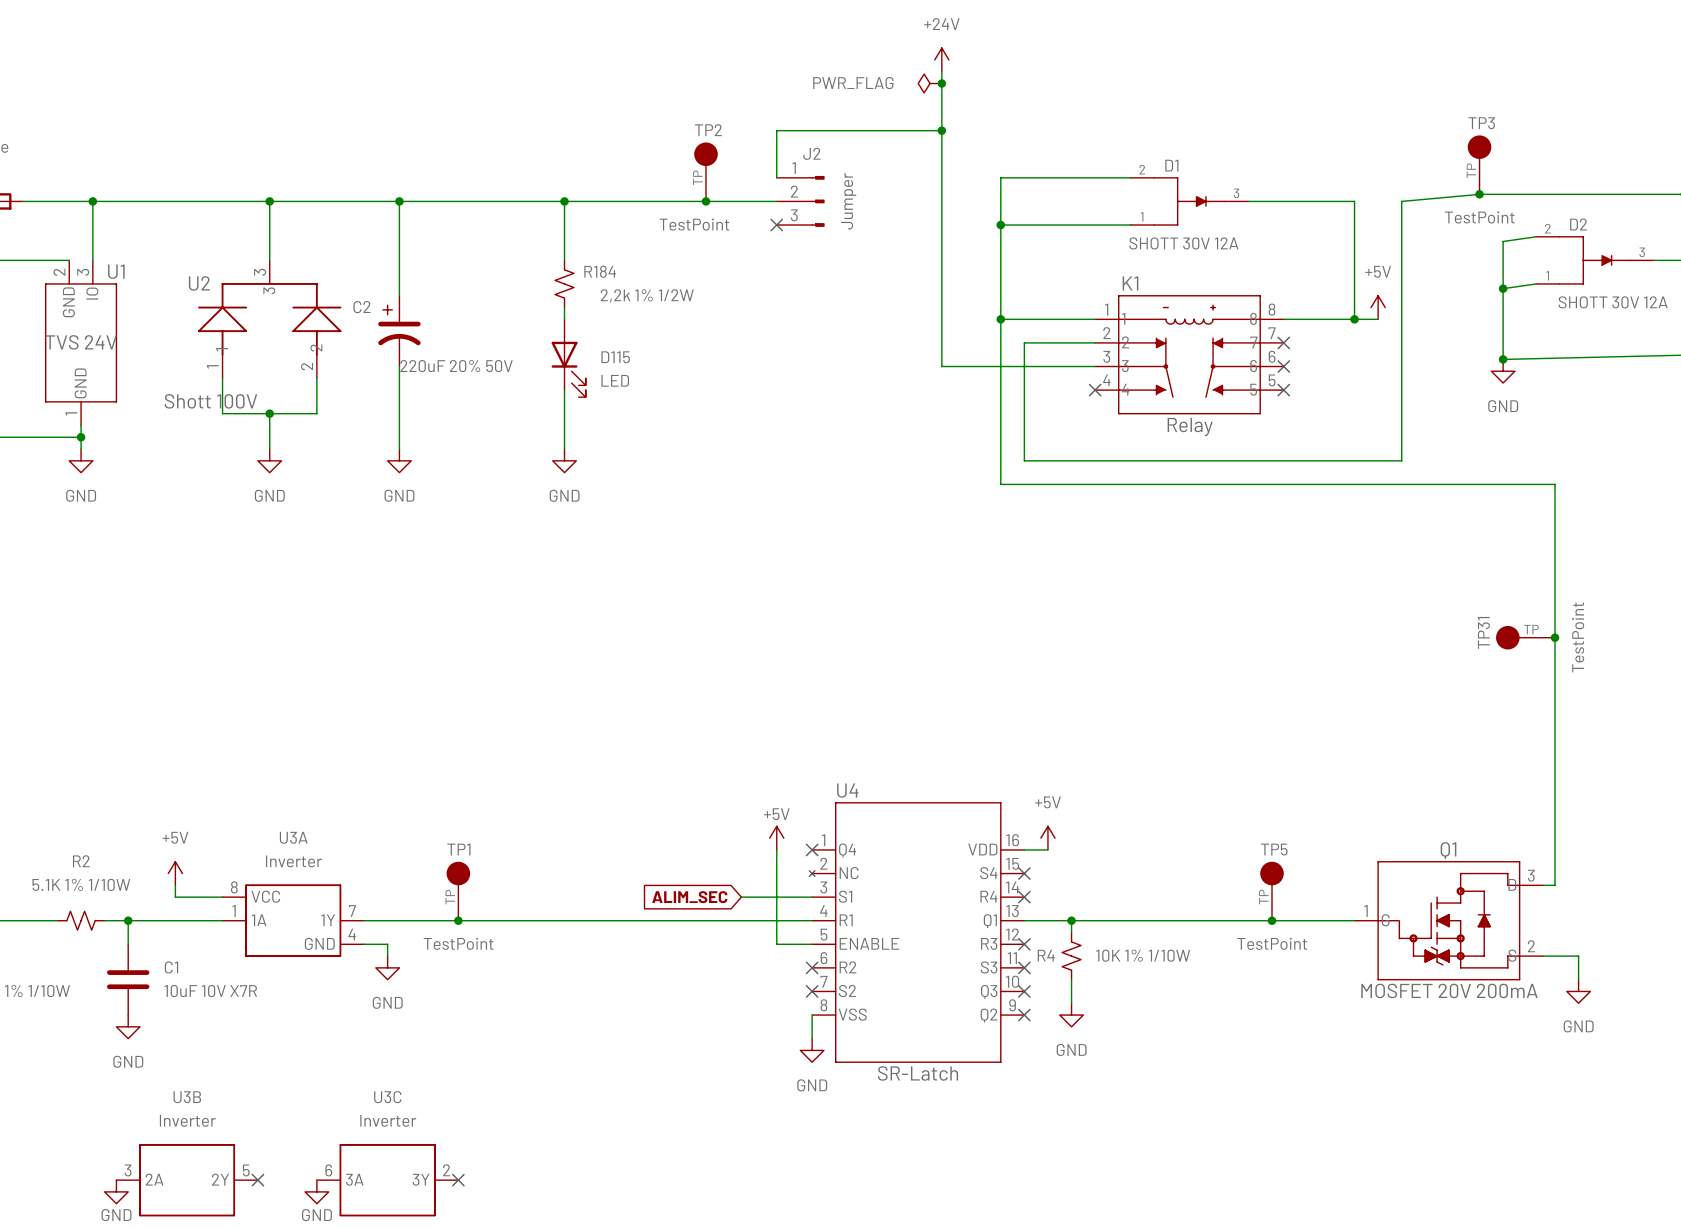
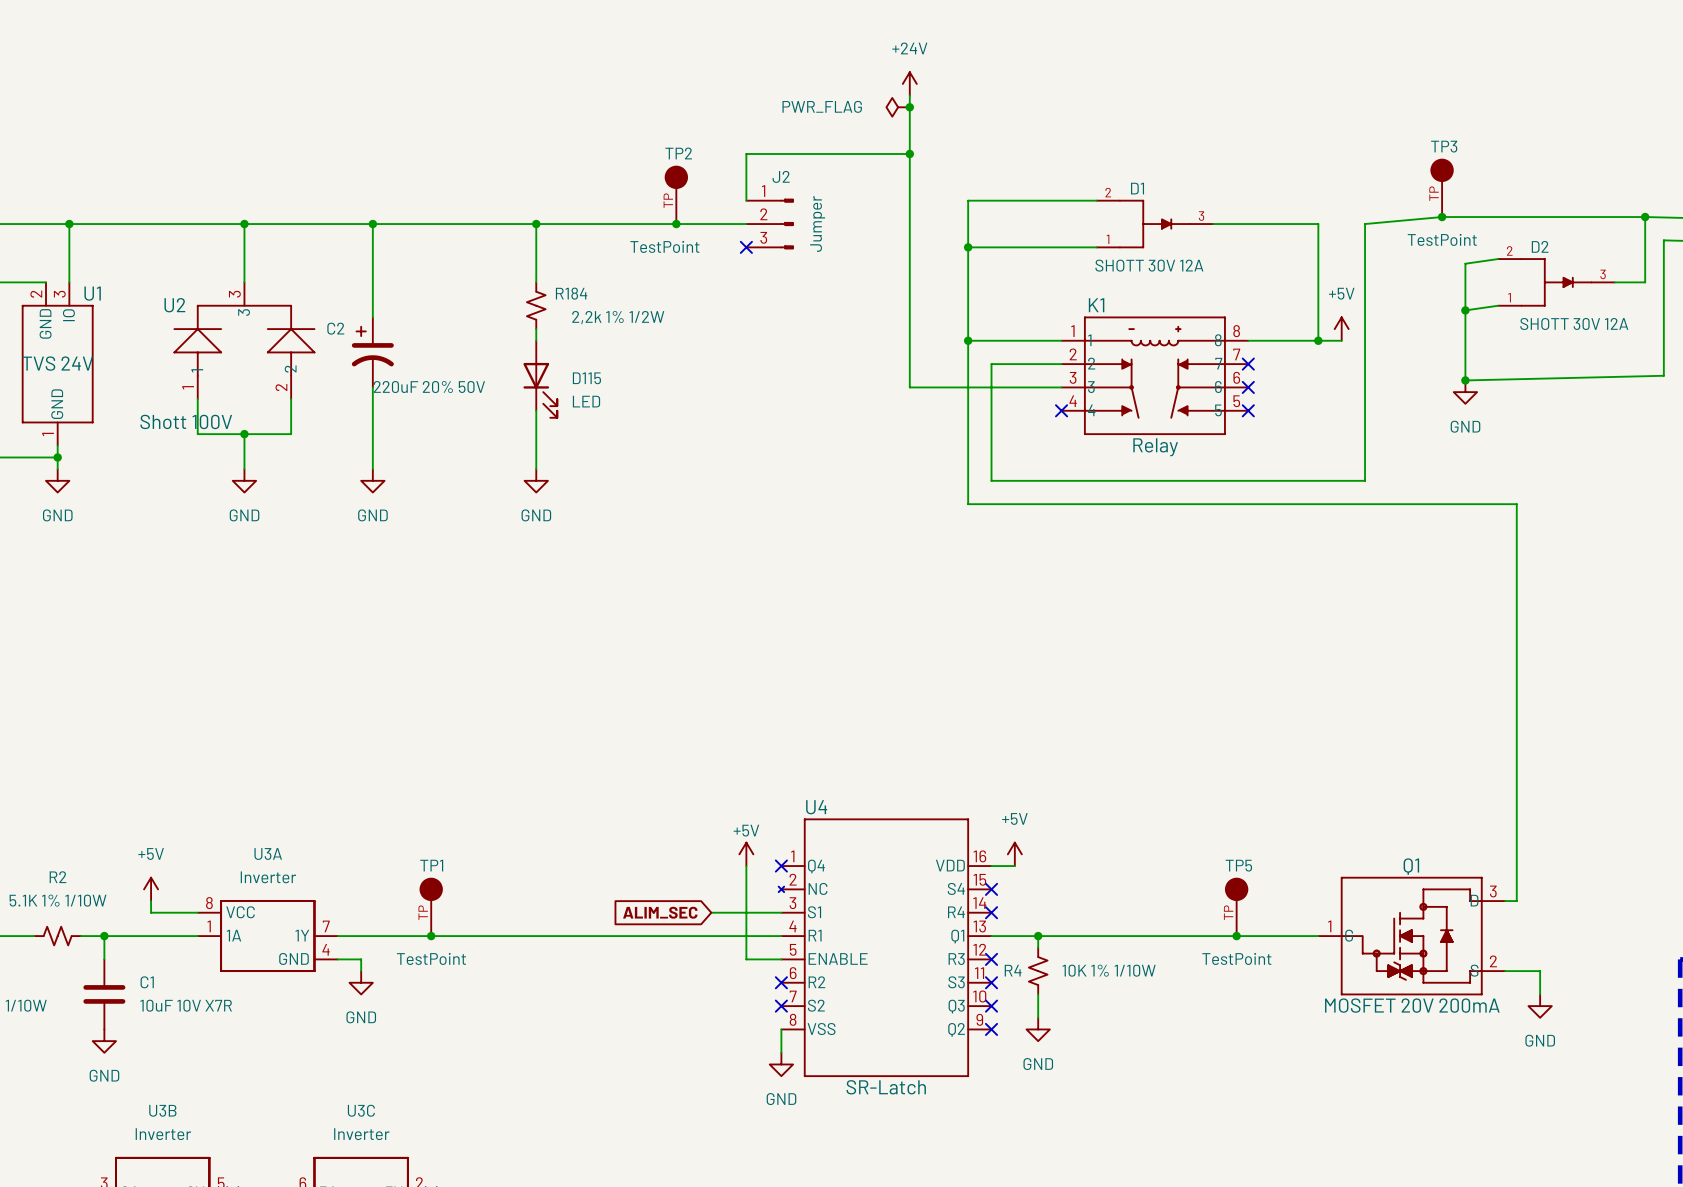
TP31: TestPoint (1525, 637) -> none
junction: (1554, 637) -> none

